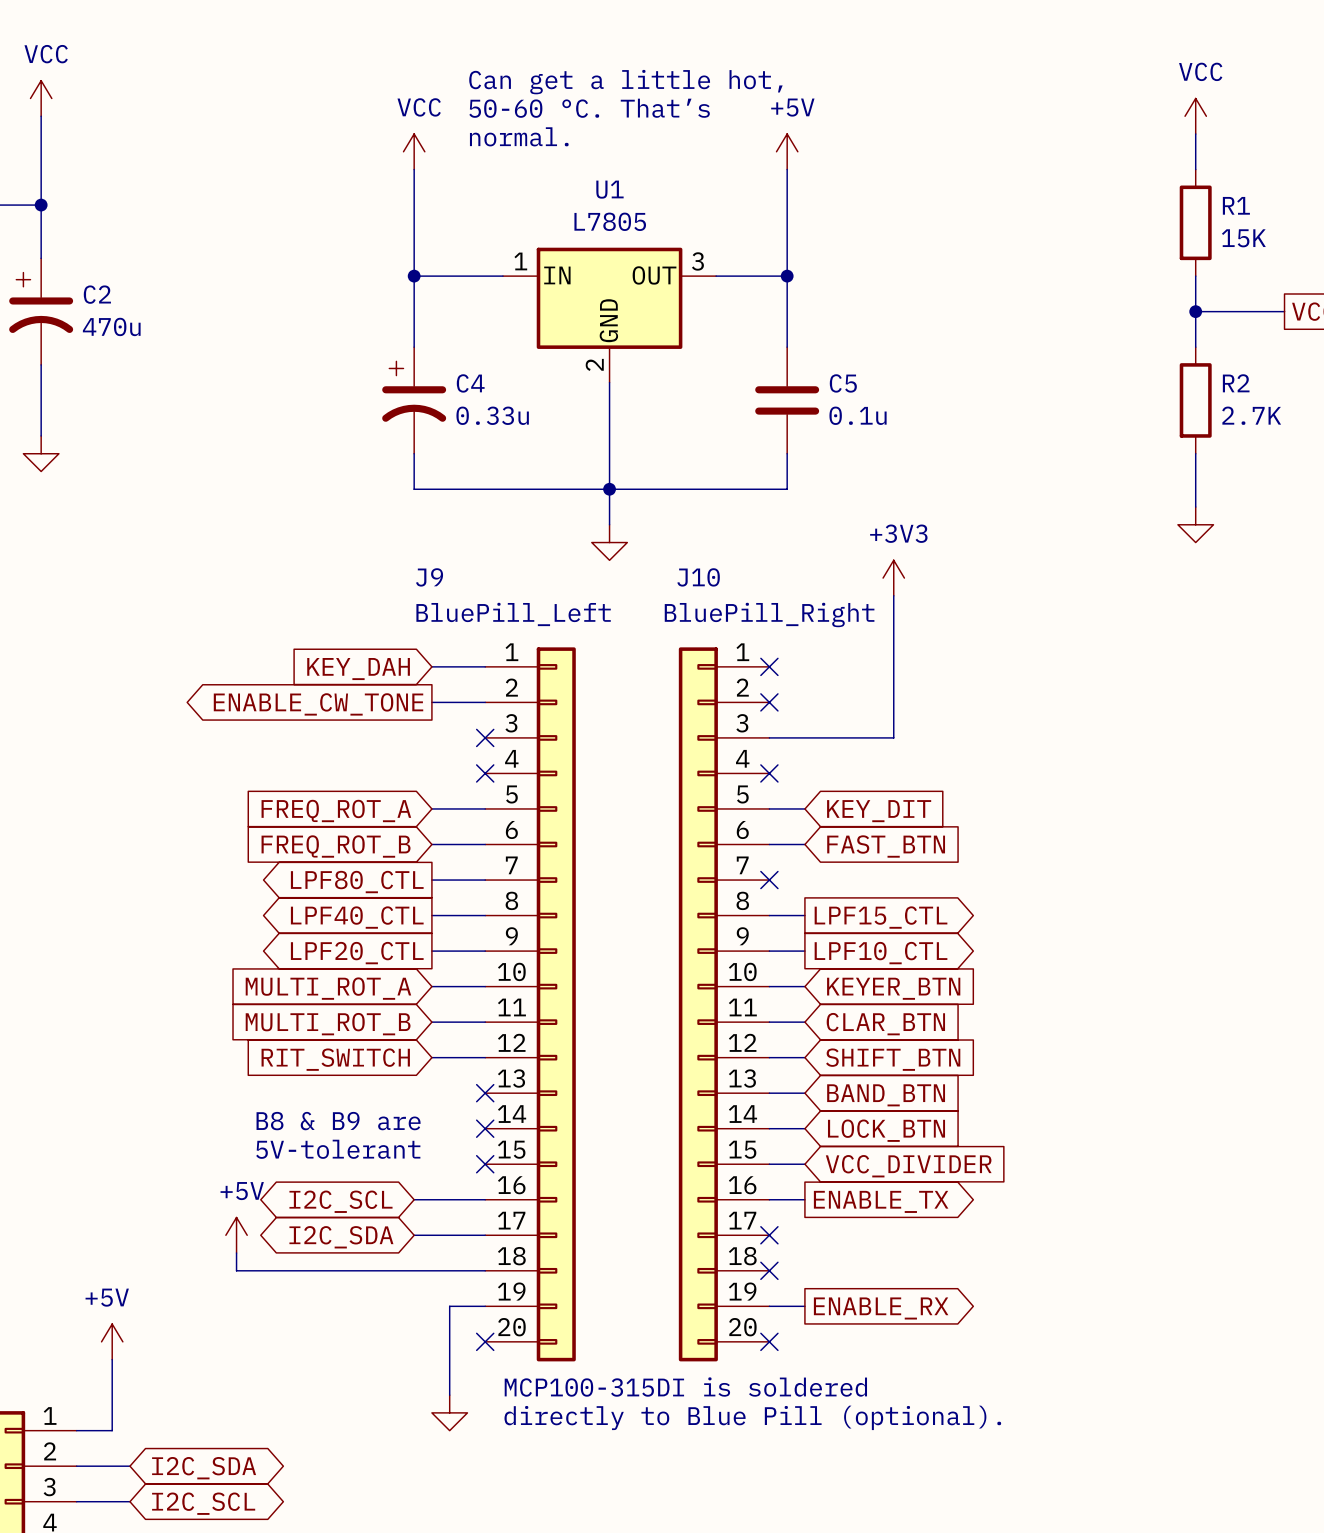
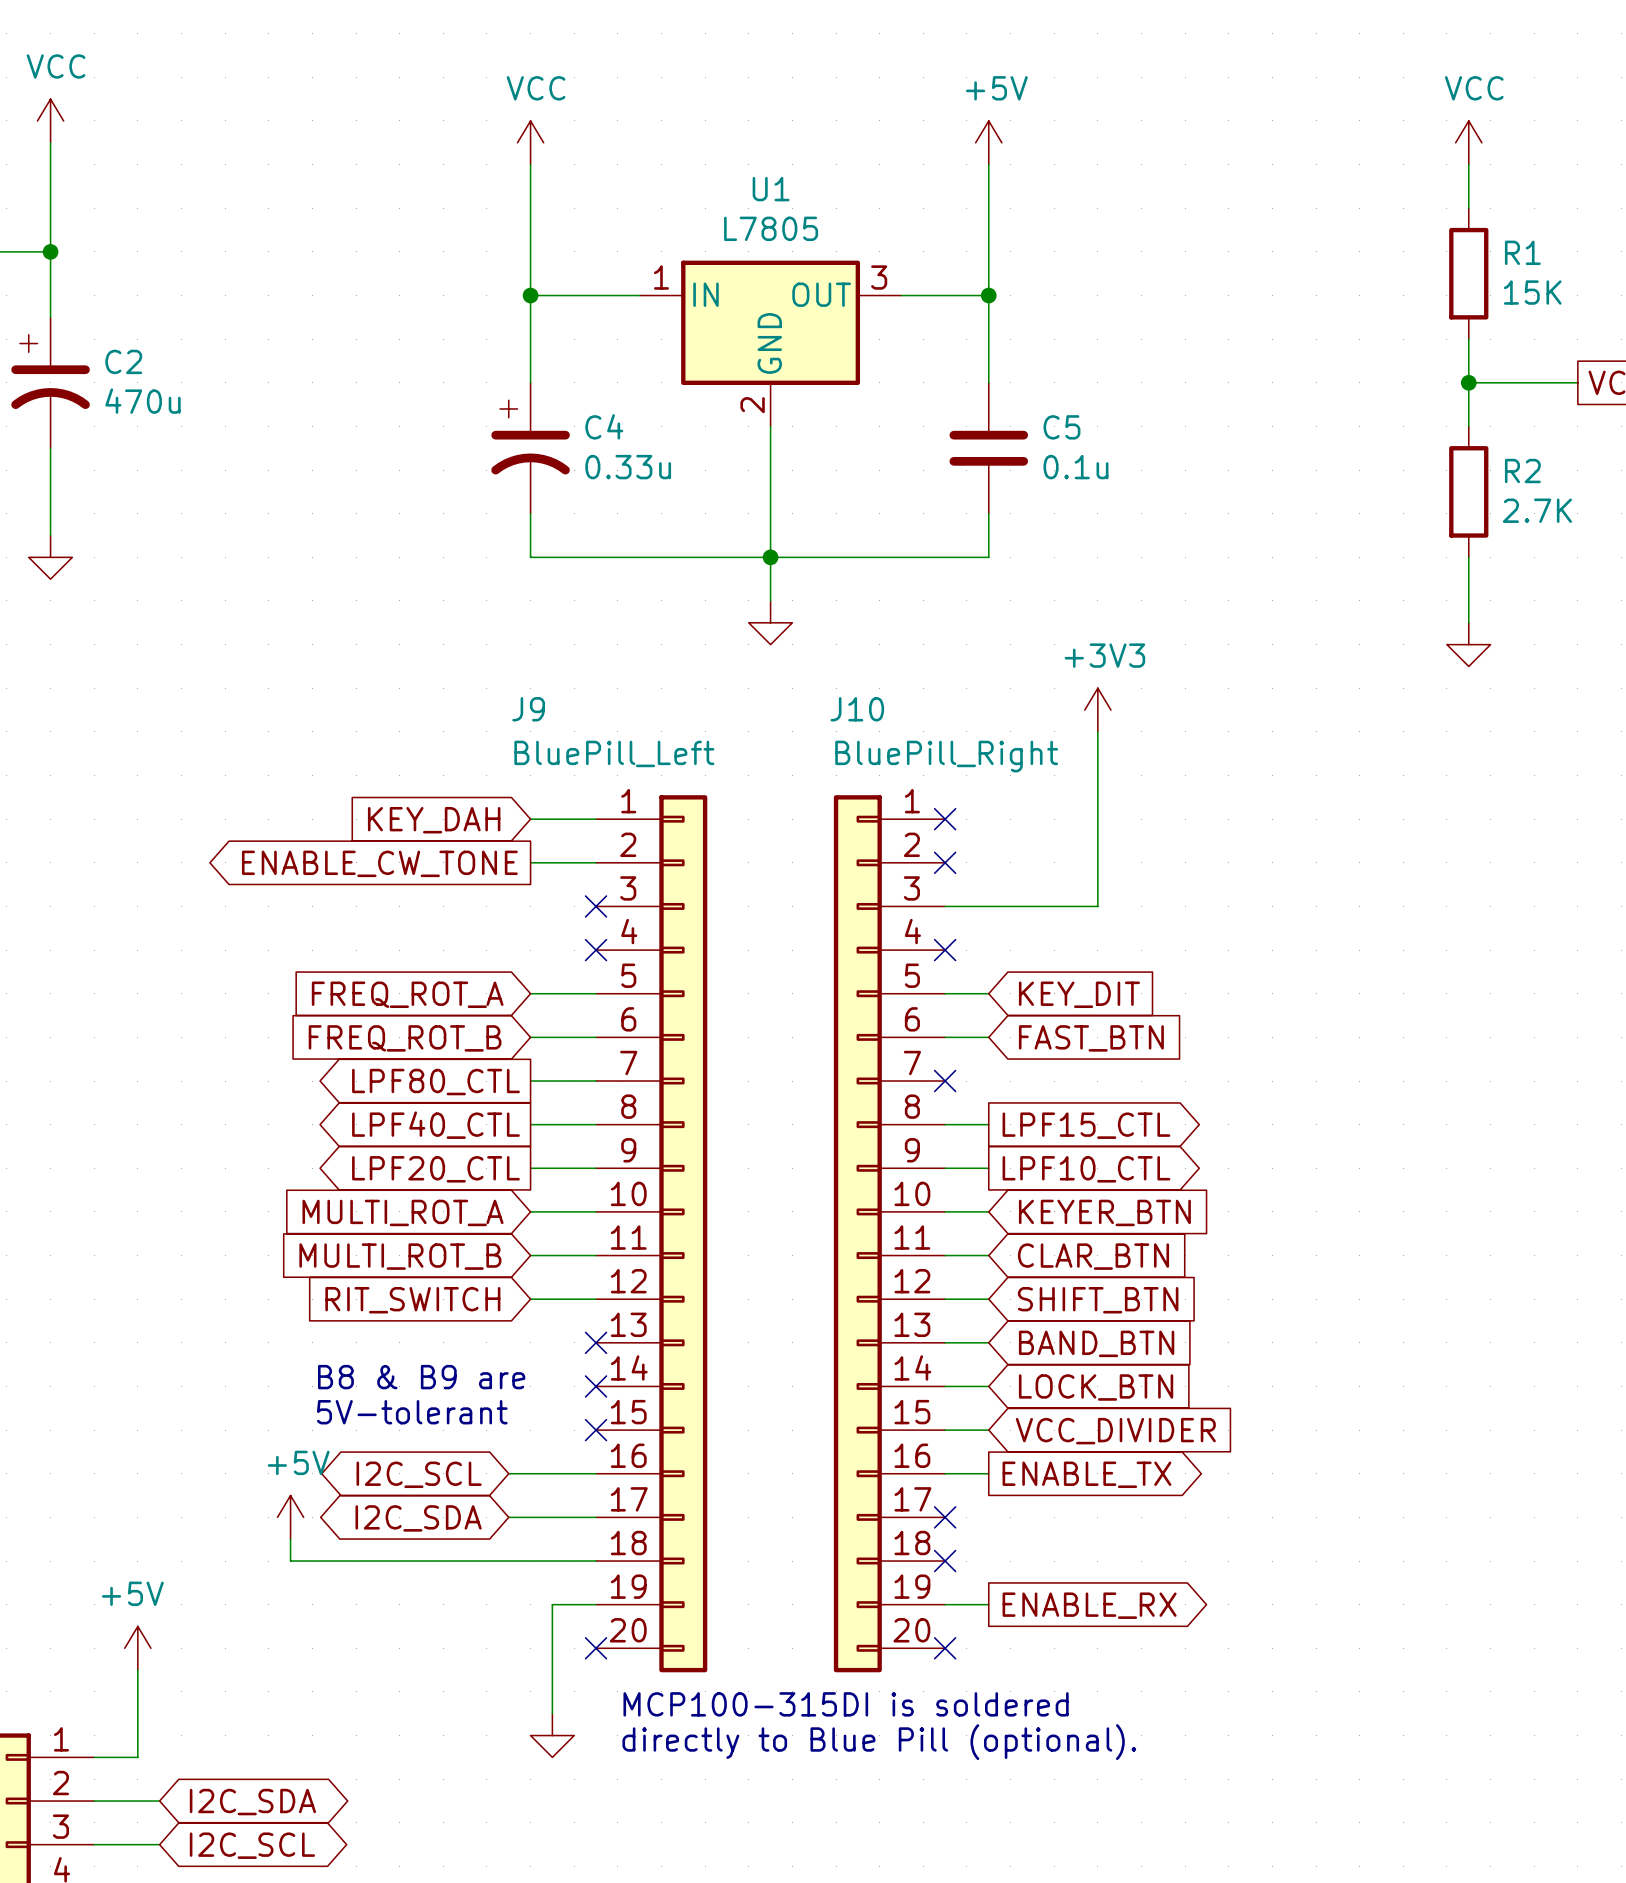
text: Can get a little hot, (625, 82) -> none
text: 50-60 °C. That’s (589, 108) -> none
text: normal. (519, 136) -> none
power symbol position: VCC (414, 151) -> VCC (530, 142)
power symbol position: +5V (787, 151) -> +5V (988, 142)
wire: (414, 169) (414, 347) -> (530, 164) (530, 382)
wire: (787, 169) (787, 347) -> (988, 164) (988, 382)
wire: (414, 276) (502, 276) -> (530, 295) (639, 295)
junction position: (414, 276) -> (530, 295)
wire: (716, 276) (787, 276) -> (901, 295) (988, 295)
junction position: (787, 276) -> (988, 295)
U1 position: (609, 315) -> (770, 343)
wire: (609, 382) (609, 524) -> (770, 426) (770, 600)
C4 position: (414, 400) -> (530, 448)
C5 position: (787, 400) -> (988, 448)
wire: (414, 453) (414, 489) (787, 489) (787, 453) -> (530, 513) (530, 557) (988, 557) (988, 513)
junction position: (609, 489) -> (770, 557)
power symbol position: (609, 542) -> (770, 622)

